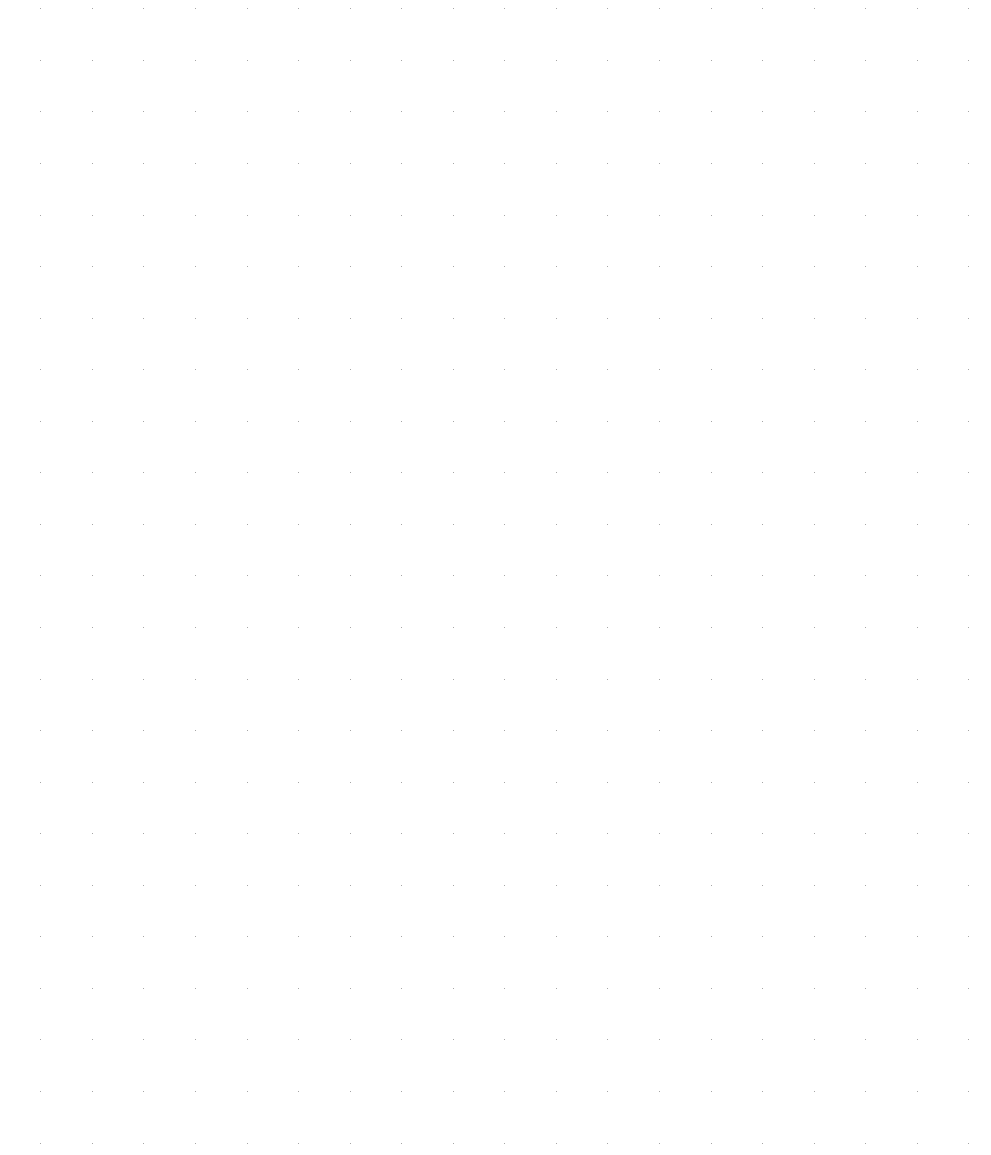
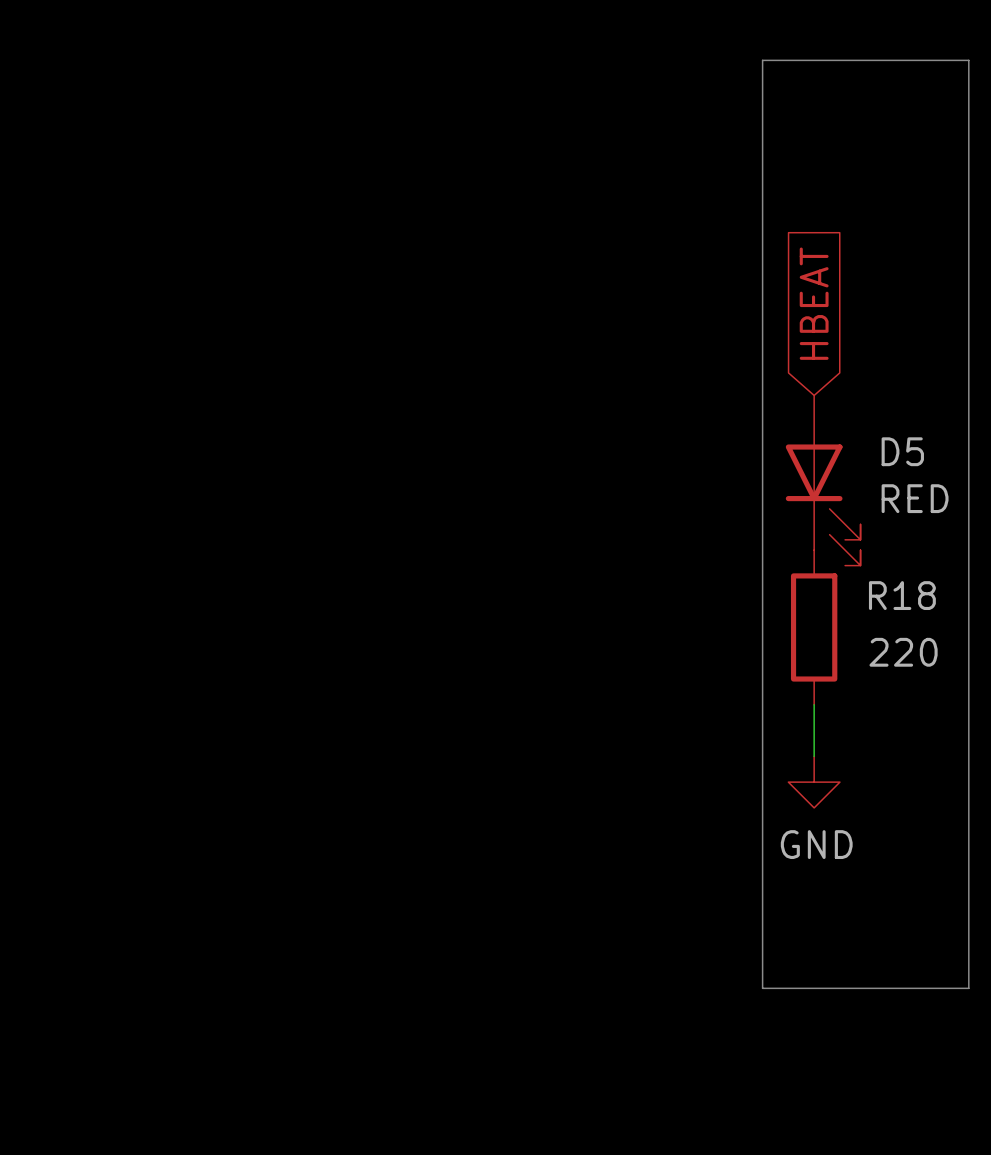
line: none -> (762, 60) (762, 988) (968, 988) (968, 60) (762, 60)
global label: none -> HBEAT (814, 303)
D5: none -> RED (823, 480)
R18: none -> 220 (814, 627)
wire: none -> (814, 704) (814, 756)
power symbol: none -> GND (814, 782)

